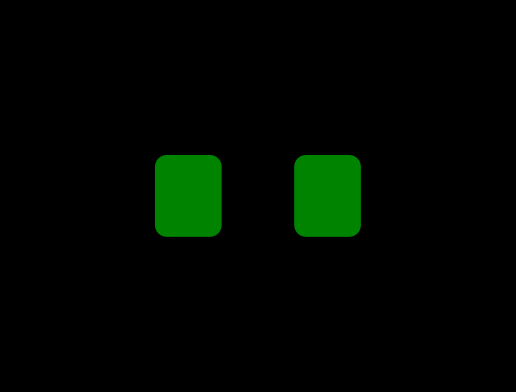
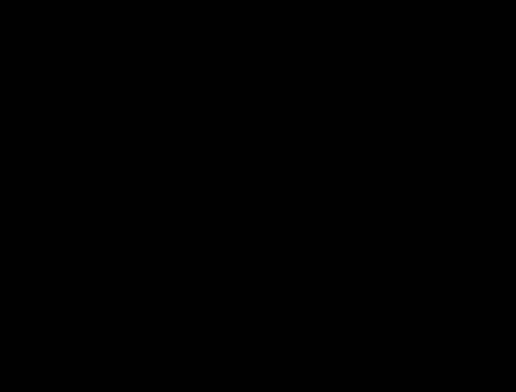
part: (257, 195) -> none

